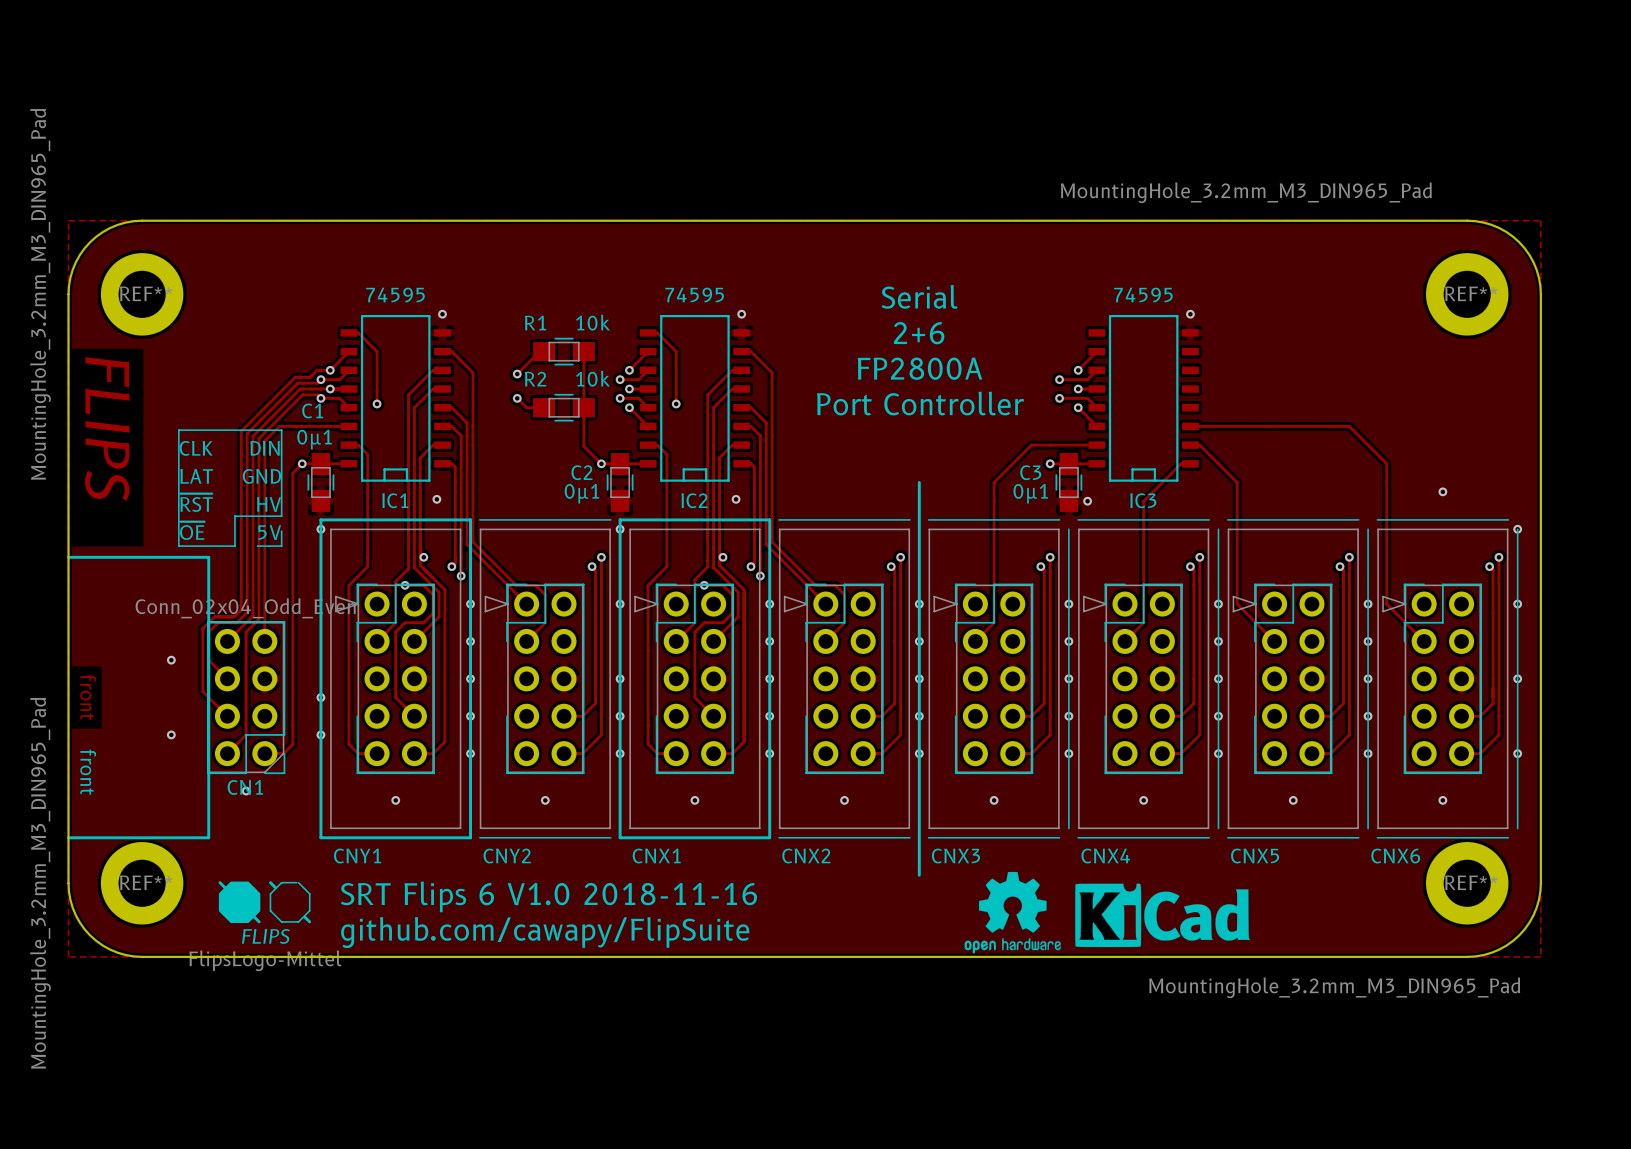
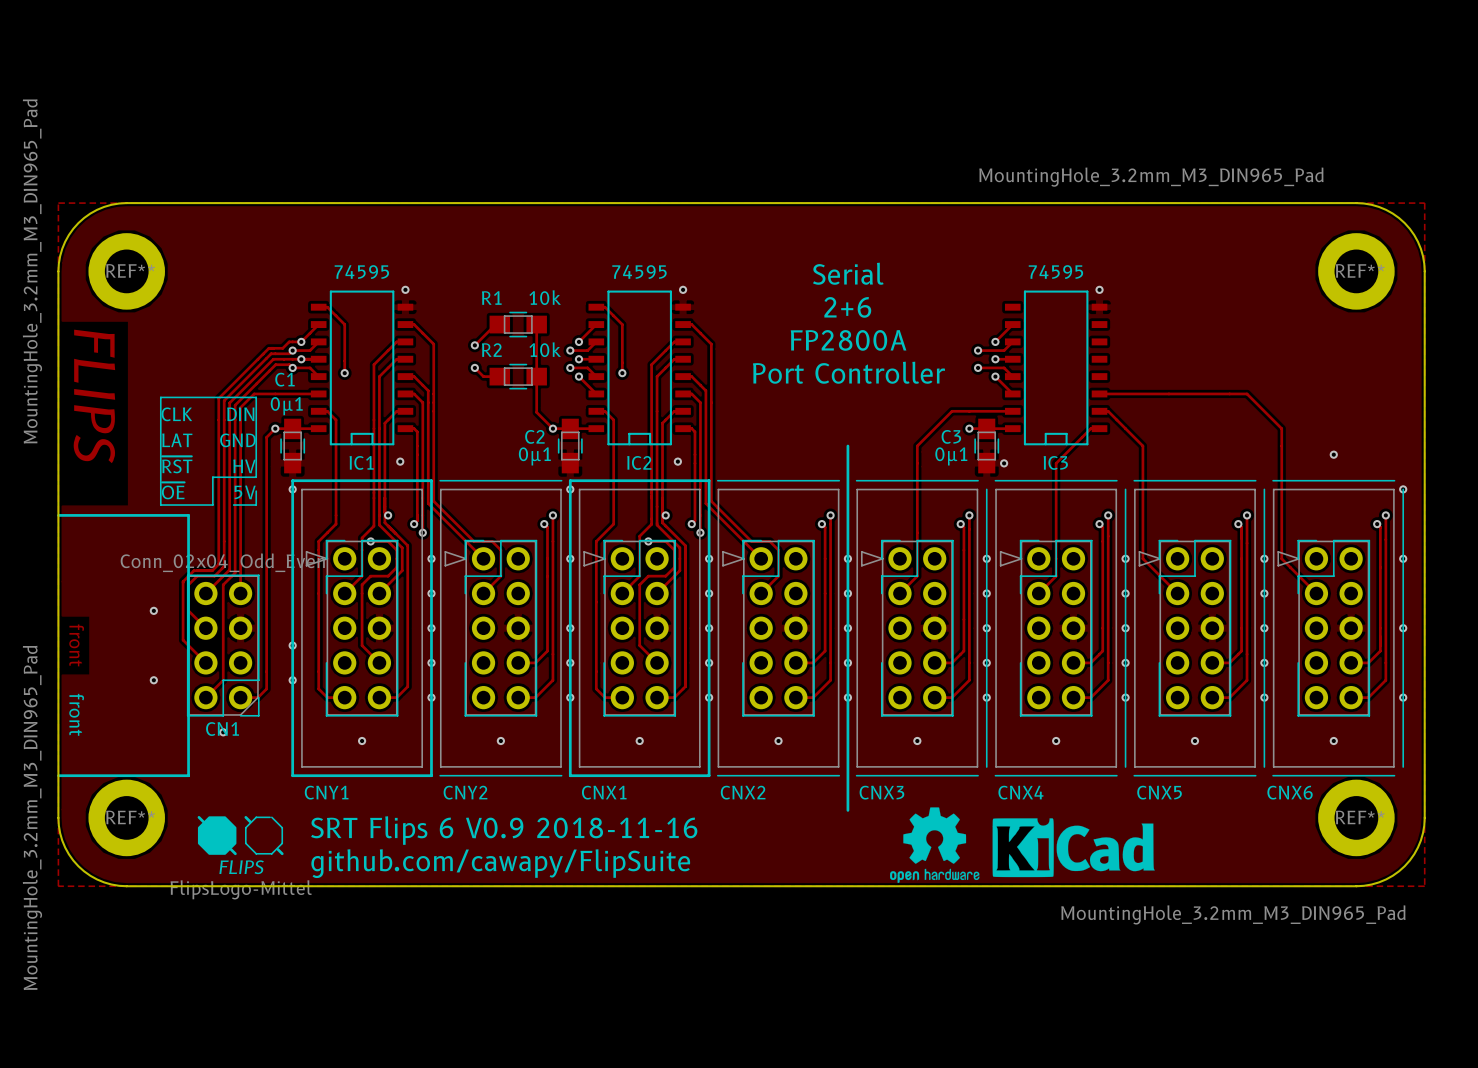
text: SRT Flips 6 V1.0 2018-11-16 (548, 896) -> SRT Flips 6 V0.9 2018-11-16 (504, 830)

